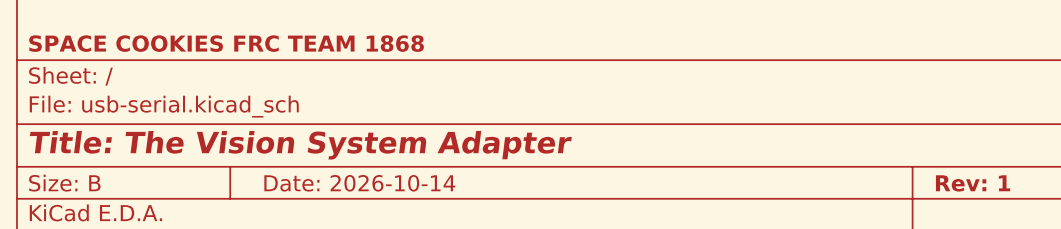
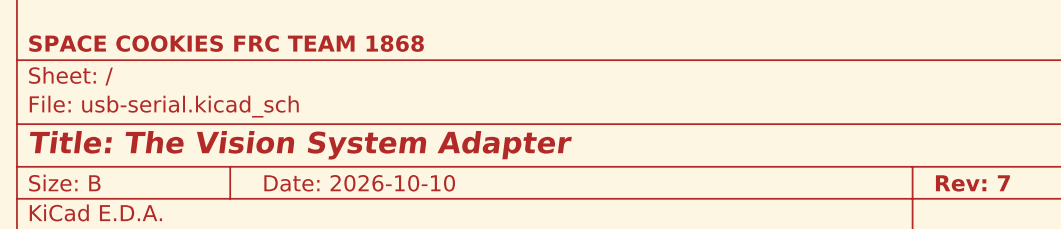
title block: Date: 2026-10-14 (359, 183) -> Date: 2026-10-10 (359, 183)
title block: Rev: 1 (973, 183) -> Rev: 7 (972, 183)

